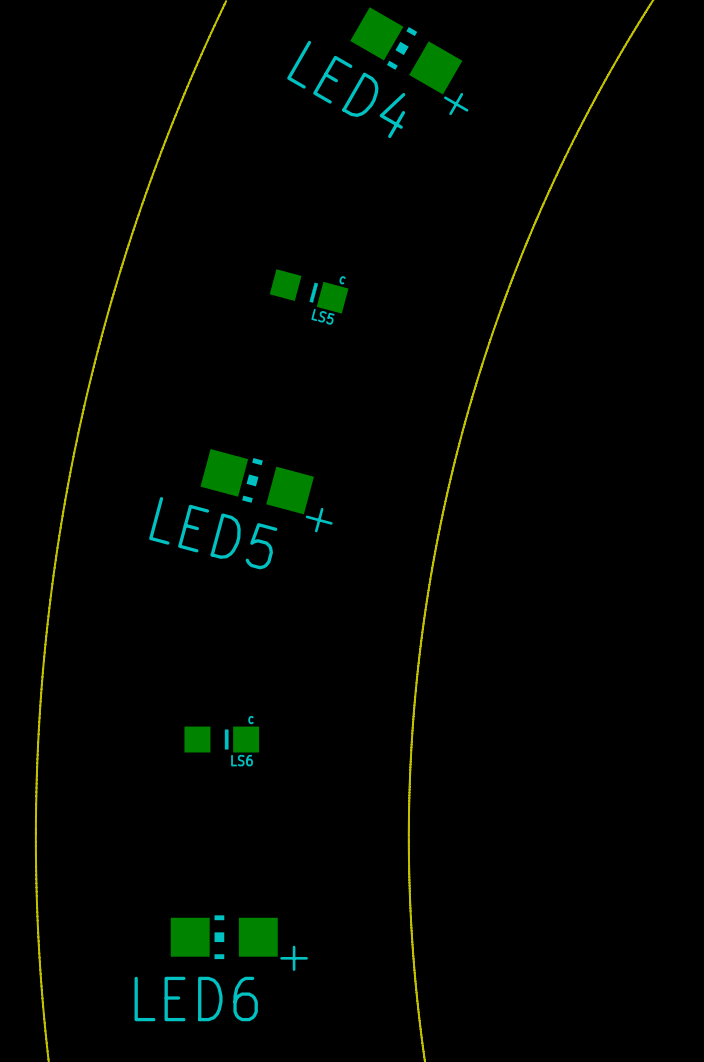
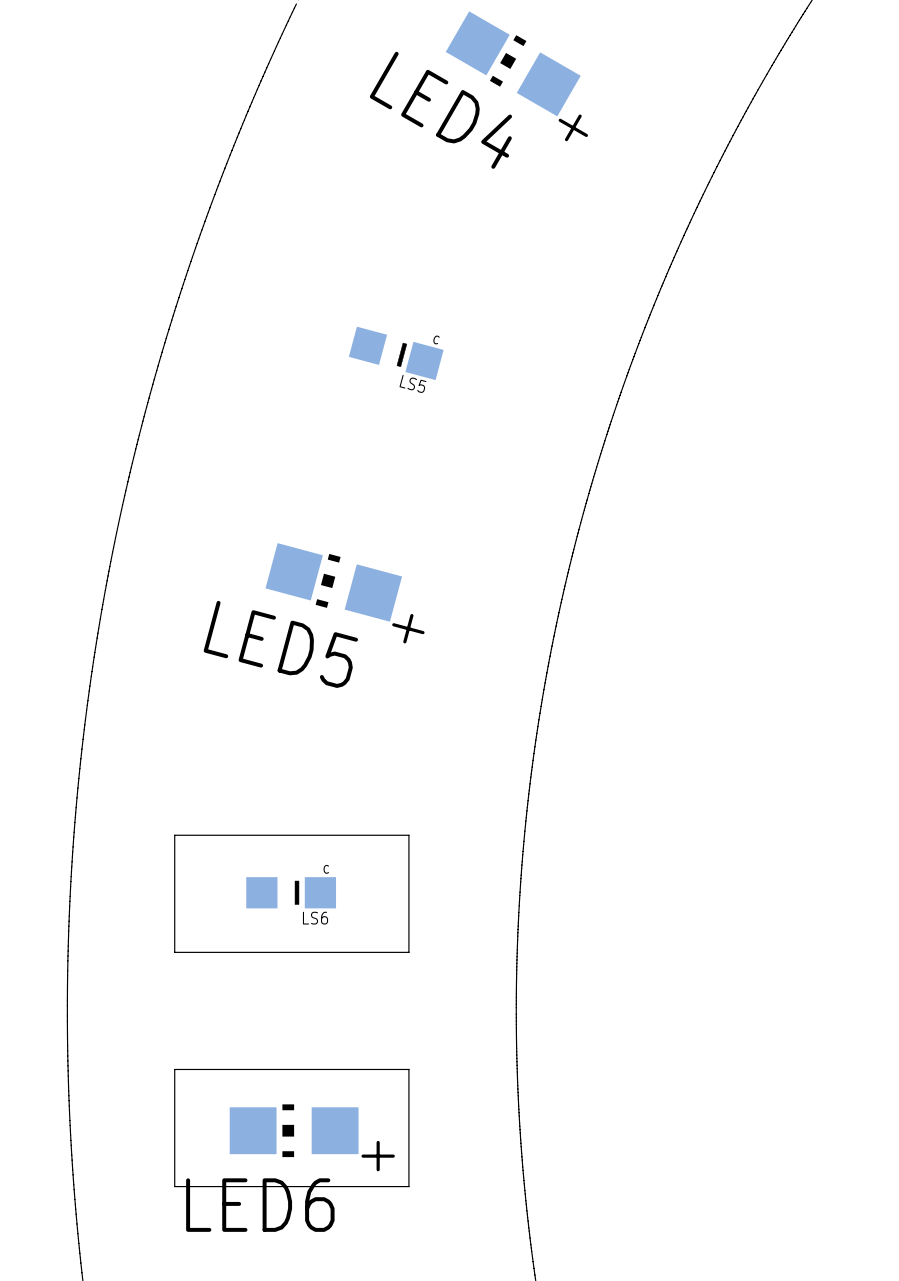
board edge: none -> (408, 835) (408, 952) (174, 952) (174, 835) (408, 835)
board edge: none -> (408, 1069) (408, 1186) (174, 1186) (174, 1069) (408, 1069)

